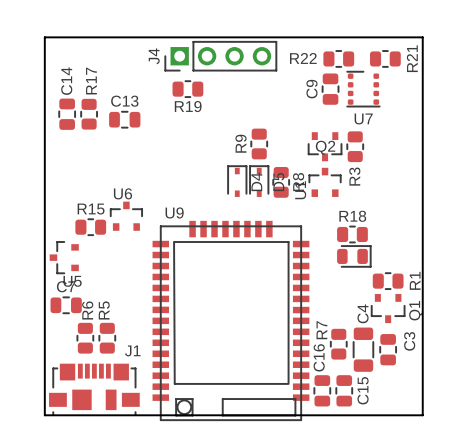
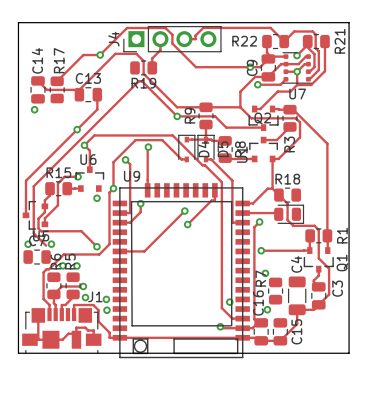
track: none -> (160, 39) (160, 50) (152, 58) (152, 67)
track: none -> (184, 39) (195, 39) (195, 35) (203, 27) (270, 27) (284, 41) (294, 31) (312, 31) (315, 34) (315, 48) (318, 51) (318, 70) (308, 79)
track: none -> (266, 41) (266, 52) (270, 56)
track: none -> (324, 41) (324, 71) (311, 85) (297, 85)
track: none -> (306, 46) (314, 54) (314, 67) (308, 71)
track: none -> (306, 46) (297, 55)
track: none -> (100, 54) (127, 28) (165, 28) (172, 34) (172, 43) (195, 67) (260, 67) (270, 56)
track: none -> (100, 55) (83, 55) (57, 81)
via: none -> (100, 55)
via: none -> (297, 55)
track: none -> (270, 56) (285, 56)
track: none -> (308, 56) (298, 64) (281, 64) (268, 76) (255, 76) (240, 91) (240, 107)
track: none -> (308, 64) (304, 64) (297, 71)
via: none -> (250, 67)
track: none -> (285, 71) (297, 71)
track: none -> (297, 71) (297, 85)
via: none -> (297, 71)
track: none -> (285, 79) (280, 84) (257, 84)
track: none -> (37, 80) (46, 89) (79, 89)
via: none -> (257, 84)
track: none -> (297, 85) (290, 91) (277, 91) (260, 109) (254, 109)
track: none -> (79, 89) (115, 53) (136, 53) (143, 61) (143, 73) (177, 107) (240, 107)
track: none -> (97, 94) (97, 109) (26, 180) (26, 215)
track: none -> (240, 107) (251, 118) (295, 118) (300, 122) (300, 137) (278, 158) (272, 158) (272, 188)
via: none -> (34, 109)
track: none -> (272, 109) (293, 109) (327, 143) (327, 250)
via: none -> (177, 116)
track: none -> (206, 124) (206, 139)
track: none -> (289, 126) (276, 140) (263, 140)
track: none -> (263, 127) (226, 127) (215, 116) (177, 116) (142, 81) (138, 81) (33, 186) (33, 233) (46, 245)
via: none -> (77, 129)
track: none -> (186, 139) (225, 140)
via: none -> (84, 145)
track: none -> (148, 147) (147, 190)
via: none -> (148, 147)
track: none -> (225, 158) (254, 158)
track: none -> (186, 159) (181, 159) (162, 140) (135, 140) (113, 162) (113, 188) (109, 192) (109, 244) (99, 254) (63, 254) (43, 272) (43, 299) (49, 305) (49, 314)
track: none -> (206, 159) (211, 159) (232, 180) (232, 222) (242, 222)
track: none -> (125, 159) (130, 164) (130, 213) (119, 213)
via: none -> (125, 159)
track: none -> (89, 169) (89, 150) (84, 145) (94, 135) (172, 135) (202, 165) (205, 165) (221, 182) (221, 308) (232, 318) (242, 318)
track: none -> (78, 176) (64, 176) (57, 183) (57, 205) (44, 218) (44, 224)
via: none -> (78, 176)
track: none -> (50, 188) (50, 195) (44, 200) (44, 212) (38, 218) (38, 228) (41, 231) (81, 231) (96, 246)
track: none -> (80, 188) (67, 188)
via: none -> (113, 188)
track: none -> (272, 188) (287, 203) (287, 220) (293, 225) (314, 225) (318, 229) (318, 258) (329, 268) (329, 294) (313, 309) (297, 309) (297, 324) (280, 340) (261, 340) (258, 337) (109, 337) (109, 332) (98, 321) (98, 310) (93, 305) (74, 305) (74, 314)
track: none -> (272, 188) (267, 188) (252, 203) (242, 203)
track: none -> (214, 190) (214, 200) (211, 200) (187, 224)
via: none -> (97, 198)
track: none -> (140, 203) (140, 212) (130, 222) (119, 222)
via: none -> (140, 203)
track: none -> (184, 211) (144, 251) (119, 251)
via: none -> (184, 211)
track: none -> (242, 213) (278, 214)
track: none -> (259, 221) (254, 227) (254, 319) (257, 322) (252, 328) (220, 326)
via: none -> (259, 221)
via: none -> (187, 224)
track: none -> (310, 235) (309, 250) (261, 250)
via: none -> (28, 244)
via: none -> (51, 244)
via: none -> (96, 246)
via: none -> (261, 250)
via: none -> (62, 265)
via: none -> (76, 265)
track: none -> (318, 269) (318, 275) (313, 280) (318, 286)
via: none -> (265, 273)
track: none -> (83, 286) (61, 286) (53, 294) (55, 314)
via: none -> (83, 286)
track: none -> (73, 294) (73, 297) (65, 305) (61, 305) (61, 314)
via: none -> (85, 297)
via: none -> (106, 299)
via: none -> (229, 302)
via: none -> (267, 309)
via: none -> (106, 310)
track: none -> (38, 315) (38, 339)
via: none -> (220, 326)
track: none -> (76, 333) (68, 333) (62, 339) (29, 339)
track: none -> (76, 339) (76, 327) (85, 327) (88, 330) (93, 330) (93, 339)

